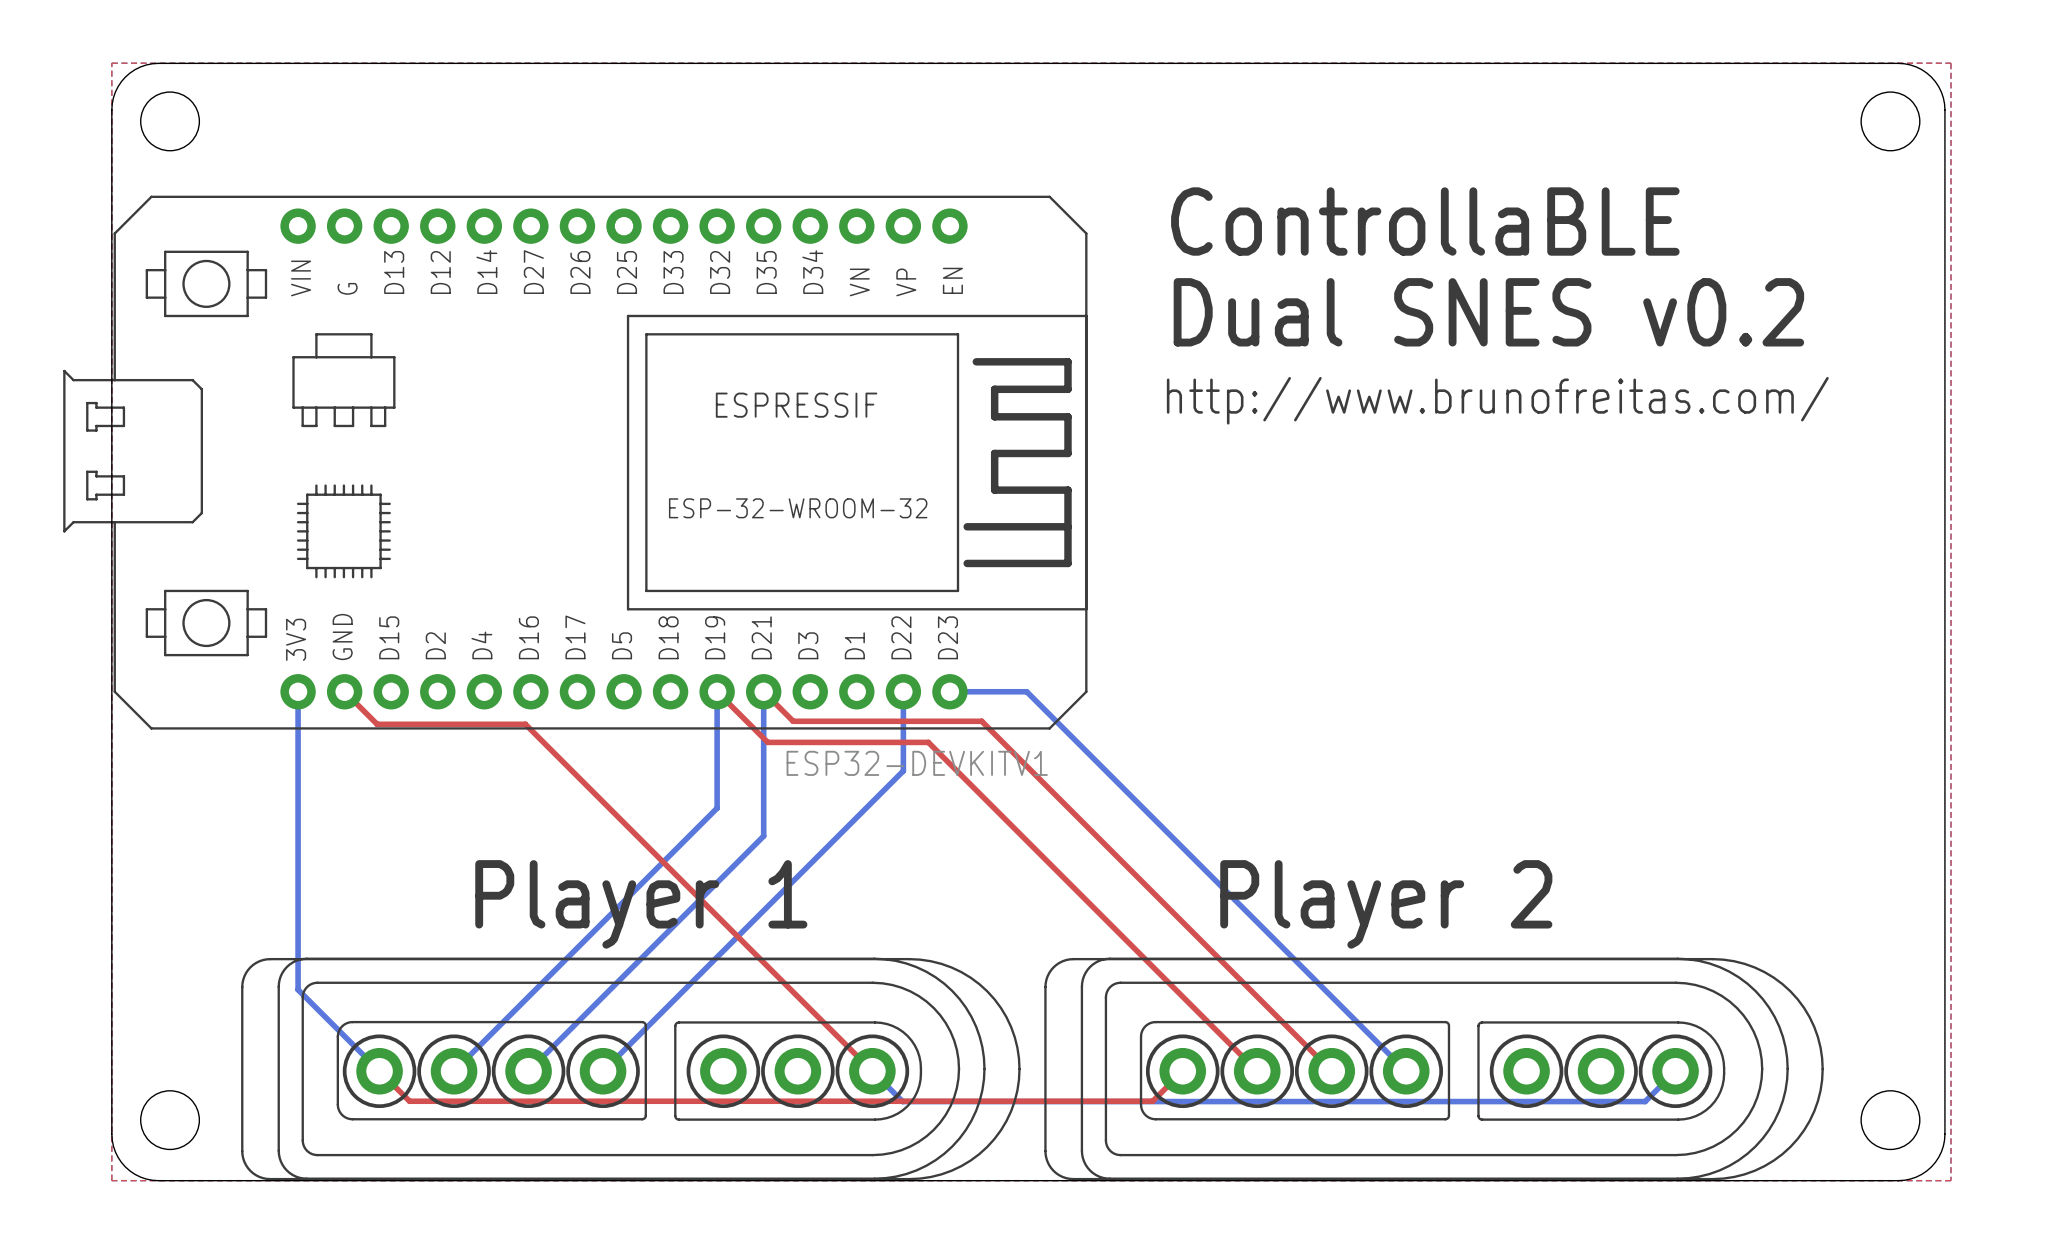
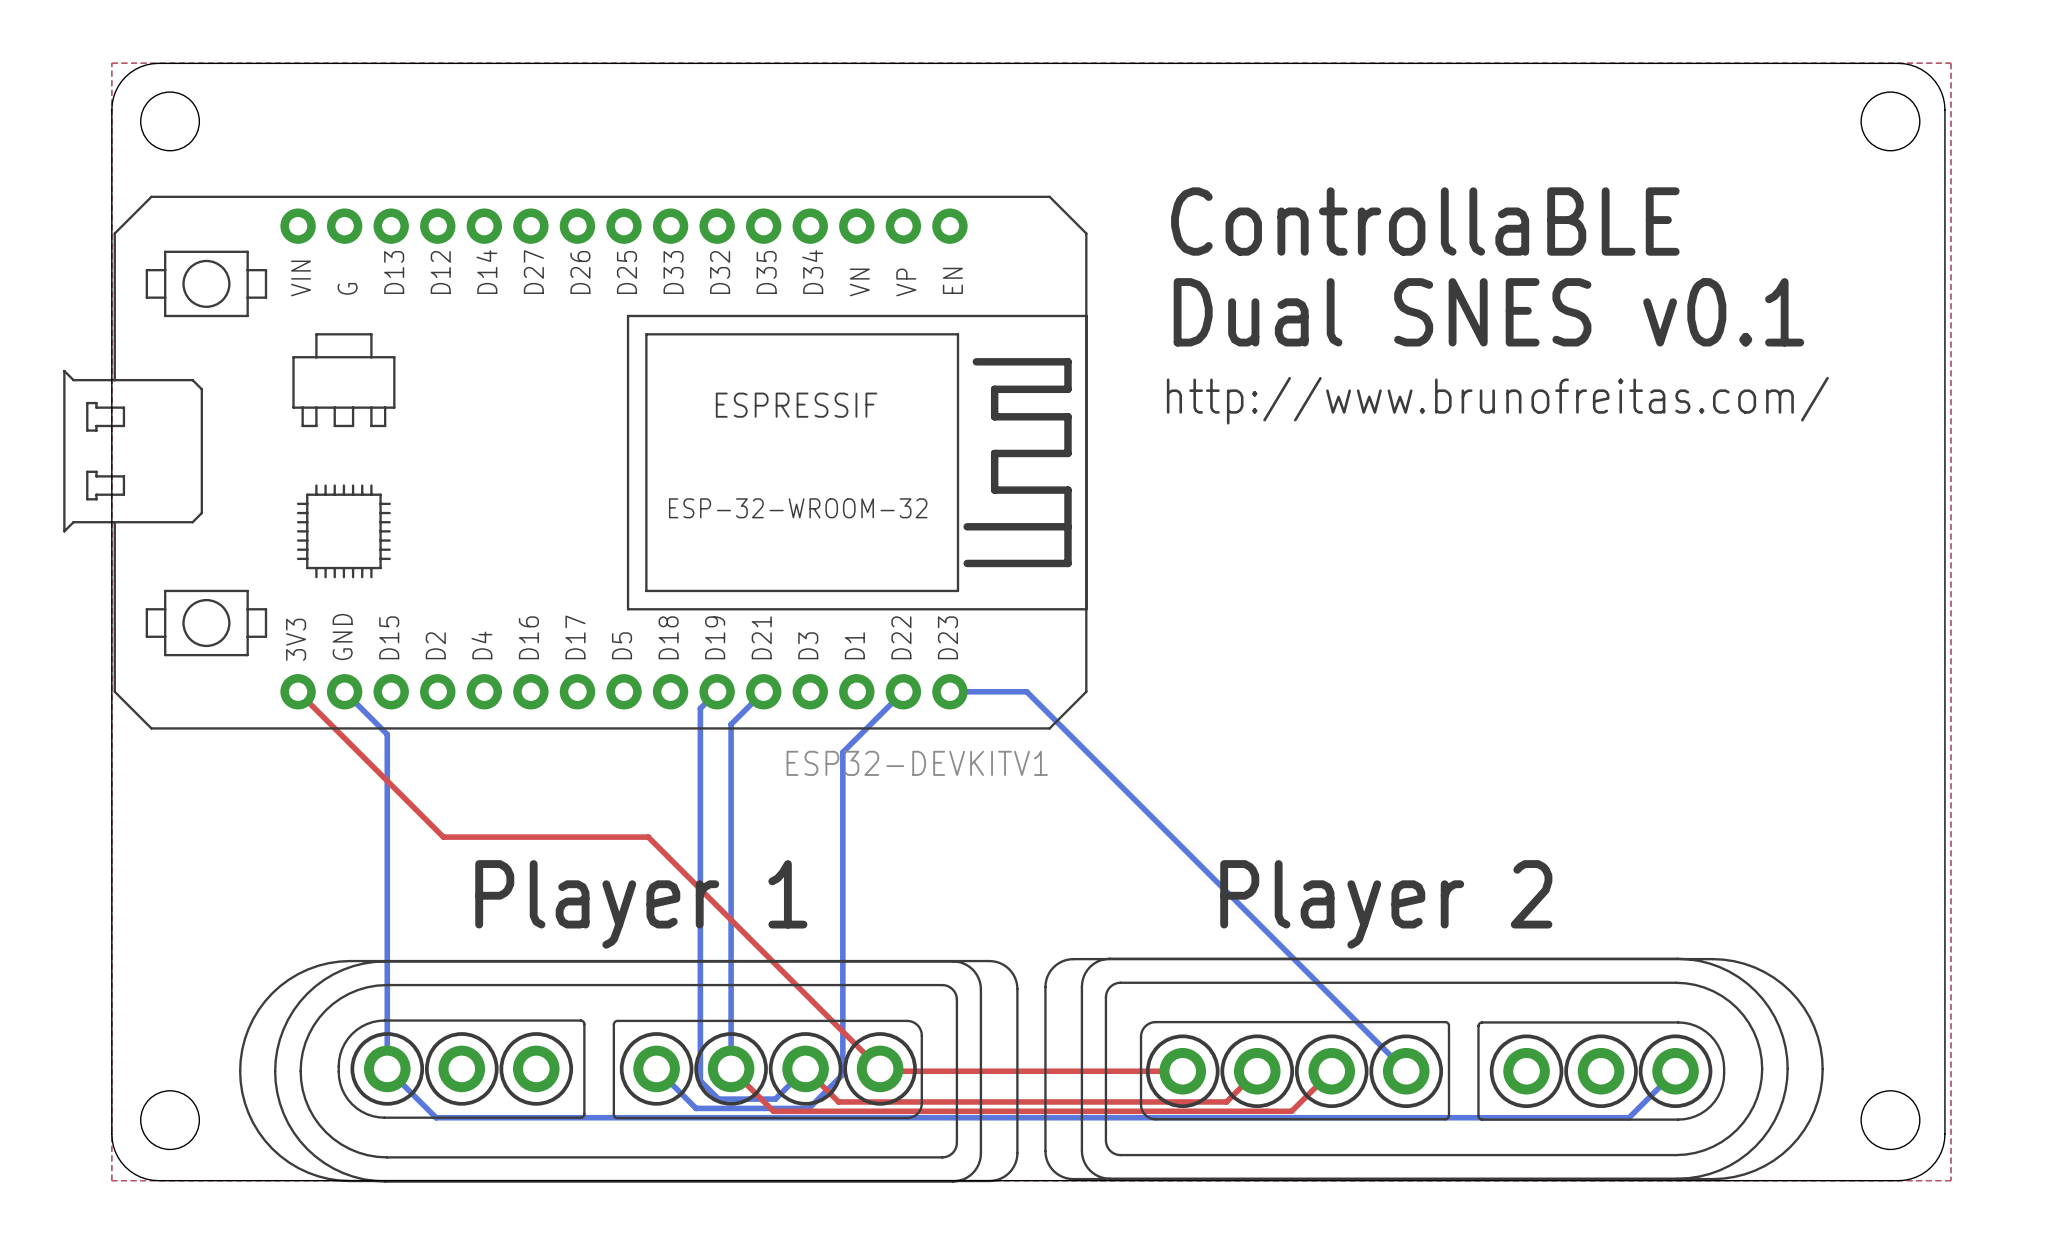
text: Dual SNES v0.2 (1488, 312) -> Dual SNES v0.1 (1488, 312)
bottom track: (298, 691) (298, 989) (379, 1071) -> none
top track: (344, 691) (377, 724) (525, 724) (872, 1071) -> none
bottom track: (717, 691) (717, 808) (454, 1071) -> (717, 691) (700, 708) (700, 1080) (718, 1099) (775, 1099) (805, 1068)
top track: (717, 691) (767, 742) (928, 742) (1257, 1071) -> (805, 1068) (838, 1101) (1226, 1101) (1257, 1071)
bottom track: (763, 691) (763, 836) (528, 1071) -> (763, 691) (731, 724) (731, 1068)
top track: (763, 691) (793, 721) (981, 721) (1331, 1071) -> (731, 1068) (773, 1111) (1291, 1111) (1331, 1071)
bottom track: (903, 691) (903, 770) (603, 1071) -> (903, 691) (842, 752) (842, 1074) (808, 1108) (696, 1108) (656, 1068)
part rotation: 0° (630, 1068) -> 180° (628, 1071)
top track: (379, 1071) (409, 1101) (1152, 1101) (1182, 1071) -> (298, 691) (443, 837) (648, 837) (882, 1071) (1182, 1071)
bottom track: (872, 1071) (902, 1101) (1645, 1101) -> (344, 691) (387, 734) (387, 1068) (436, 1117) (1629, 1117) (1645, 1101)

